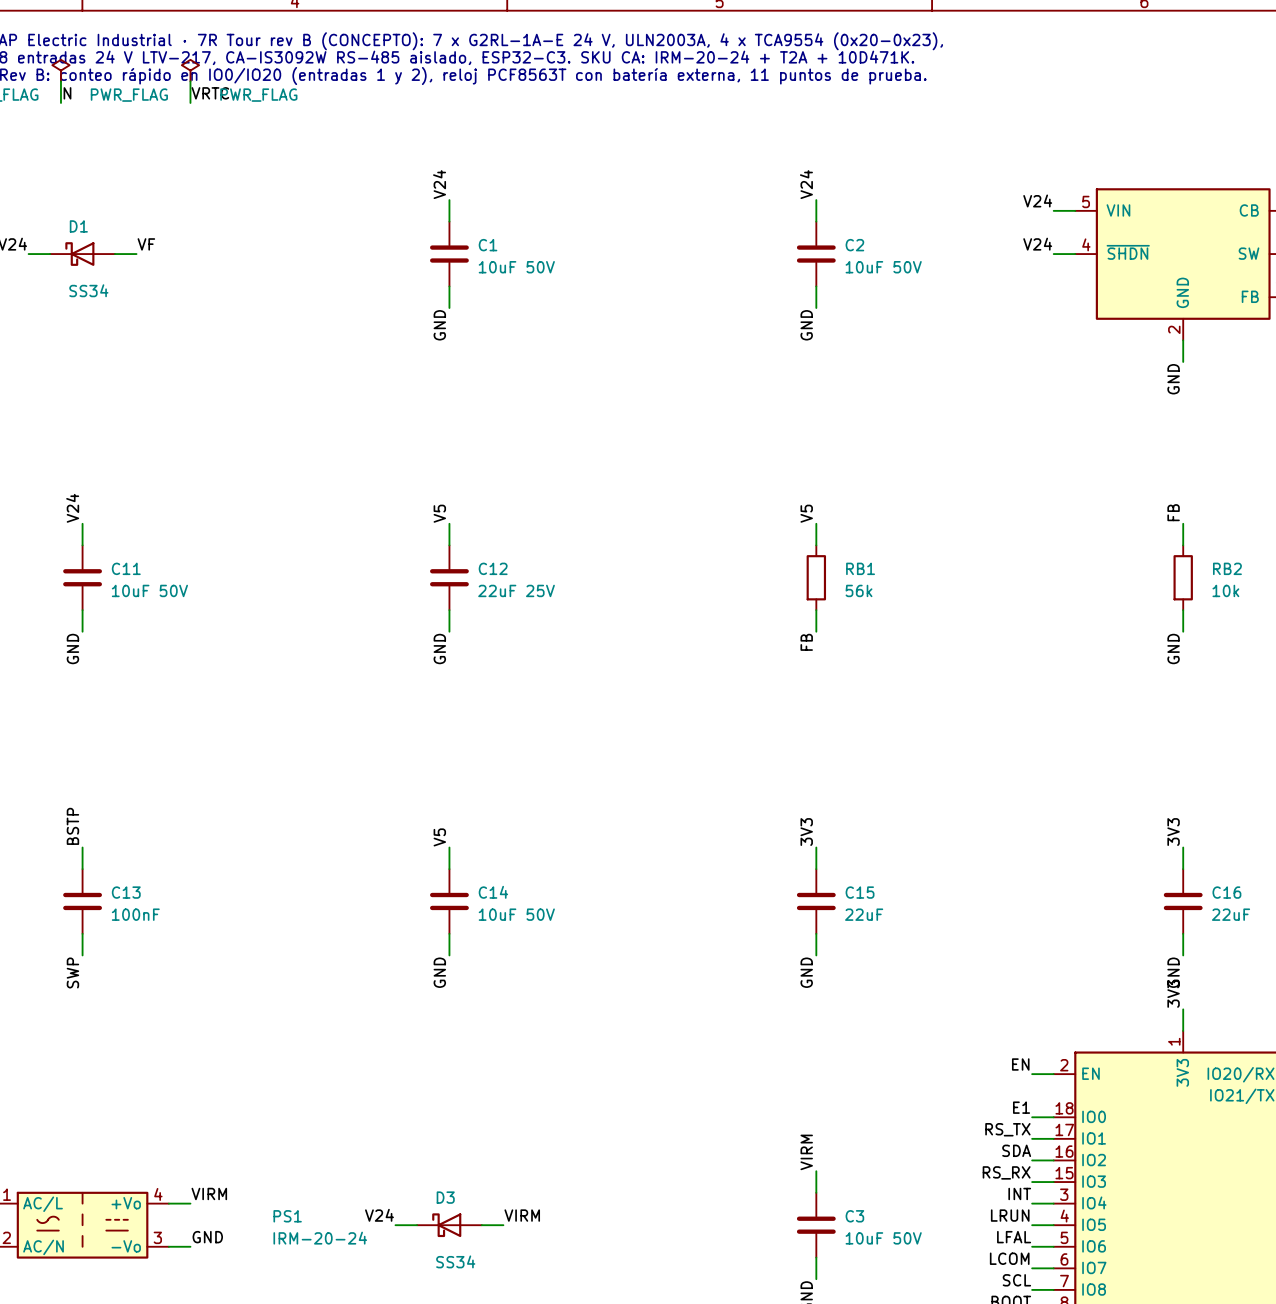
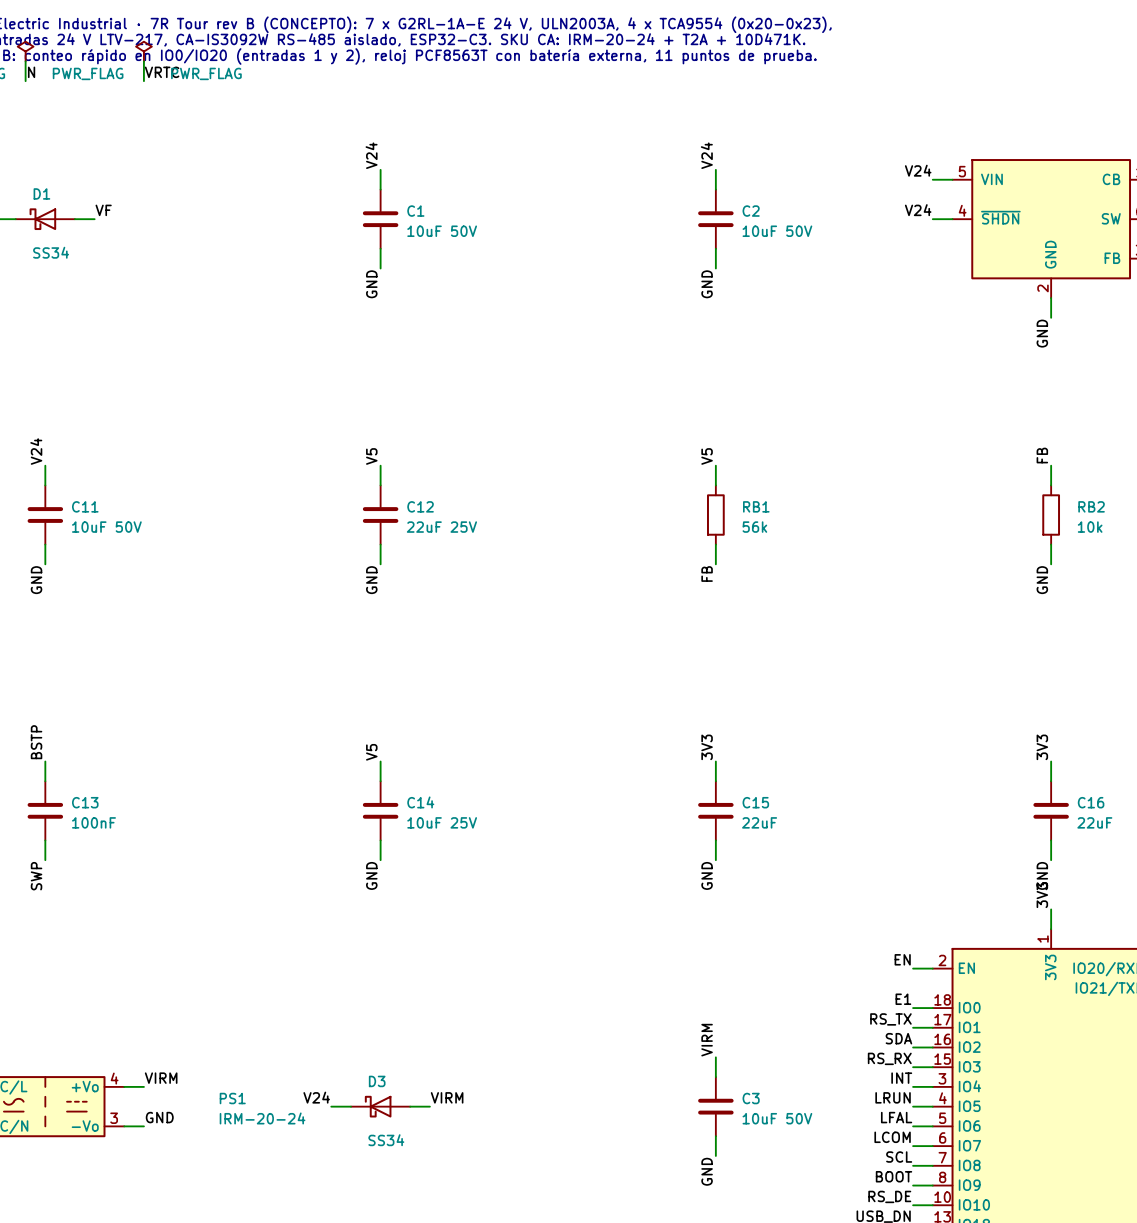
C14 value: 10uF 50V (516, 914) -> 10uF 25V (442, 822)

